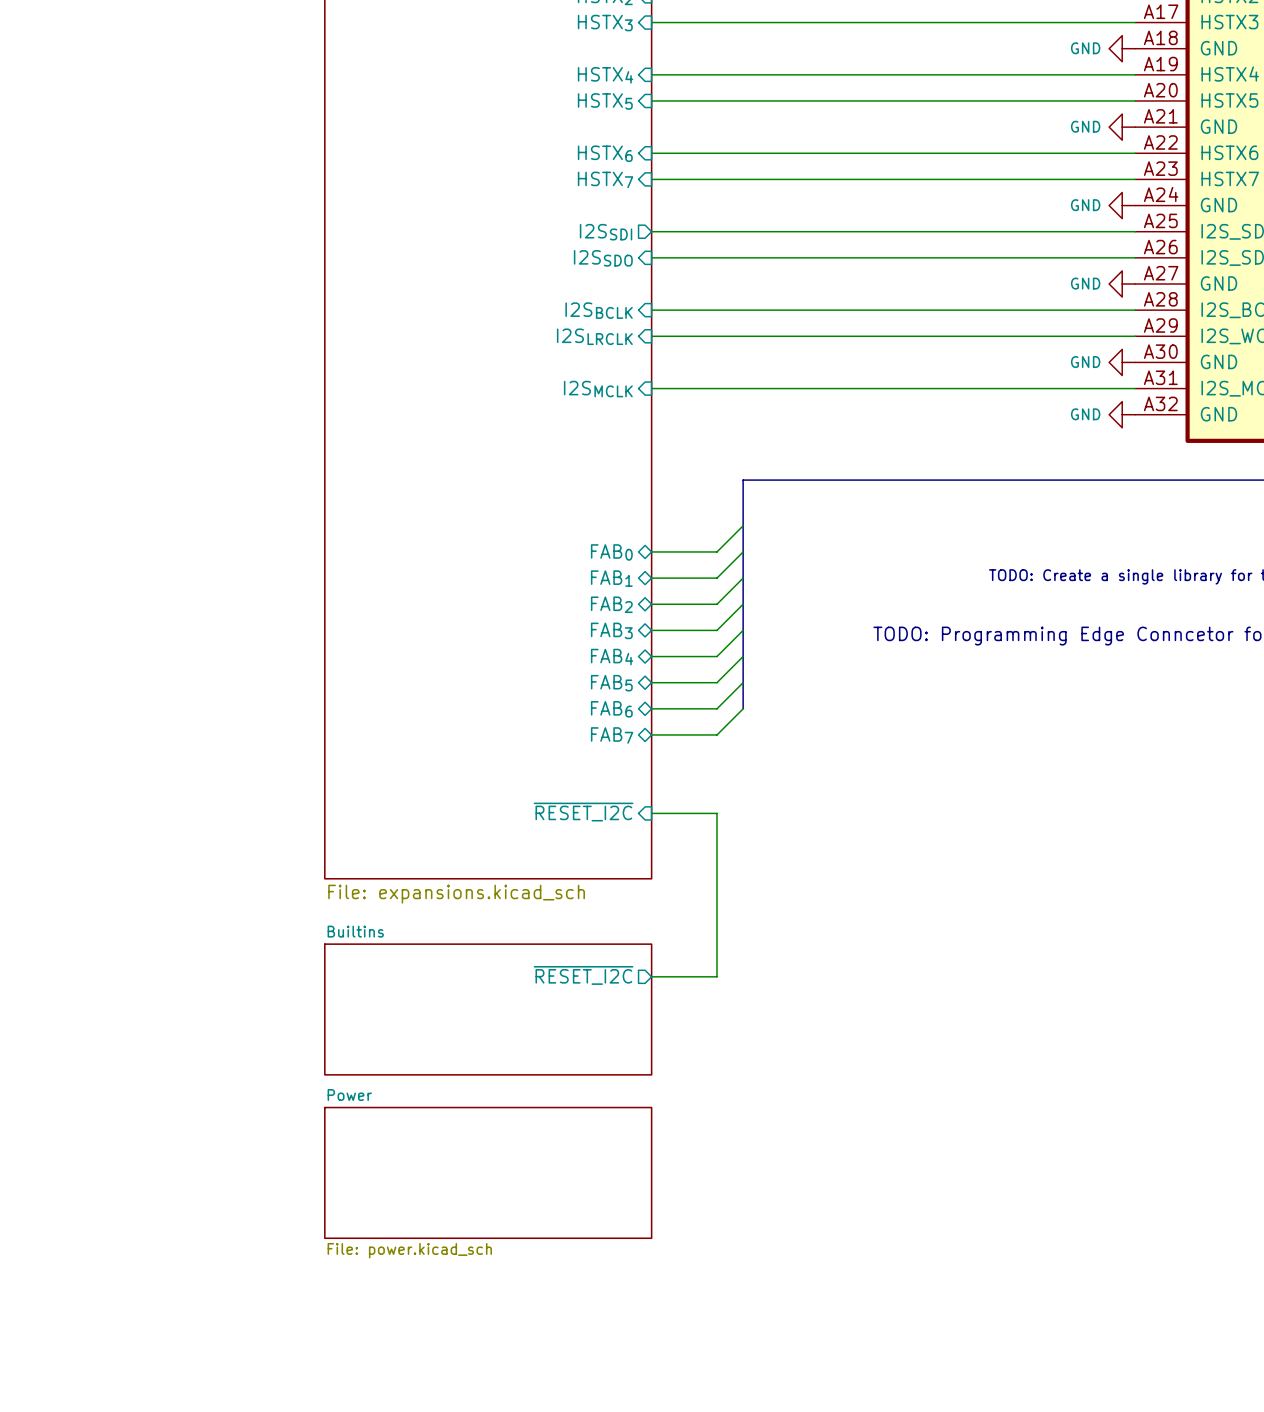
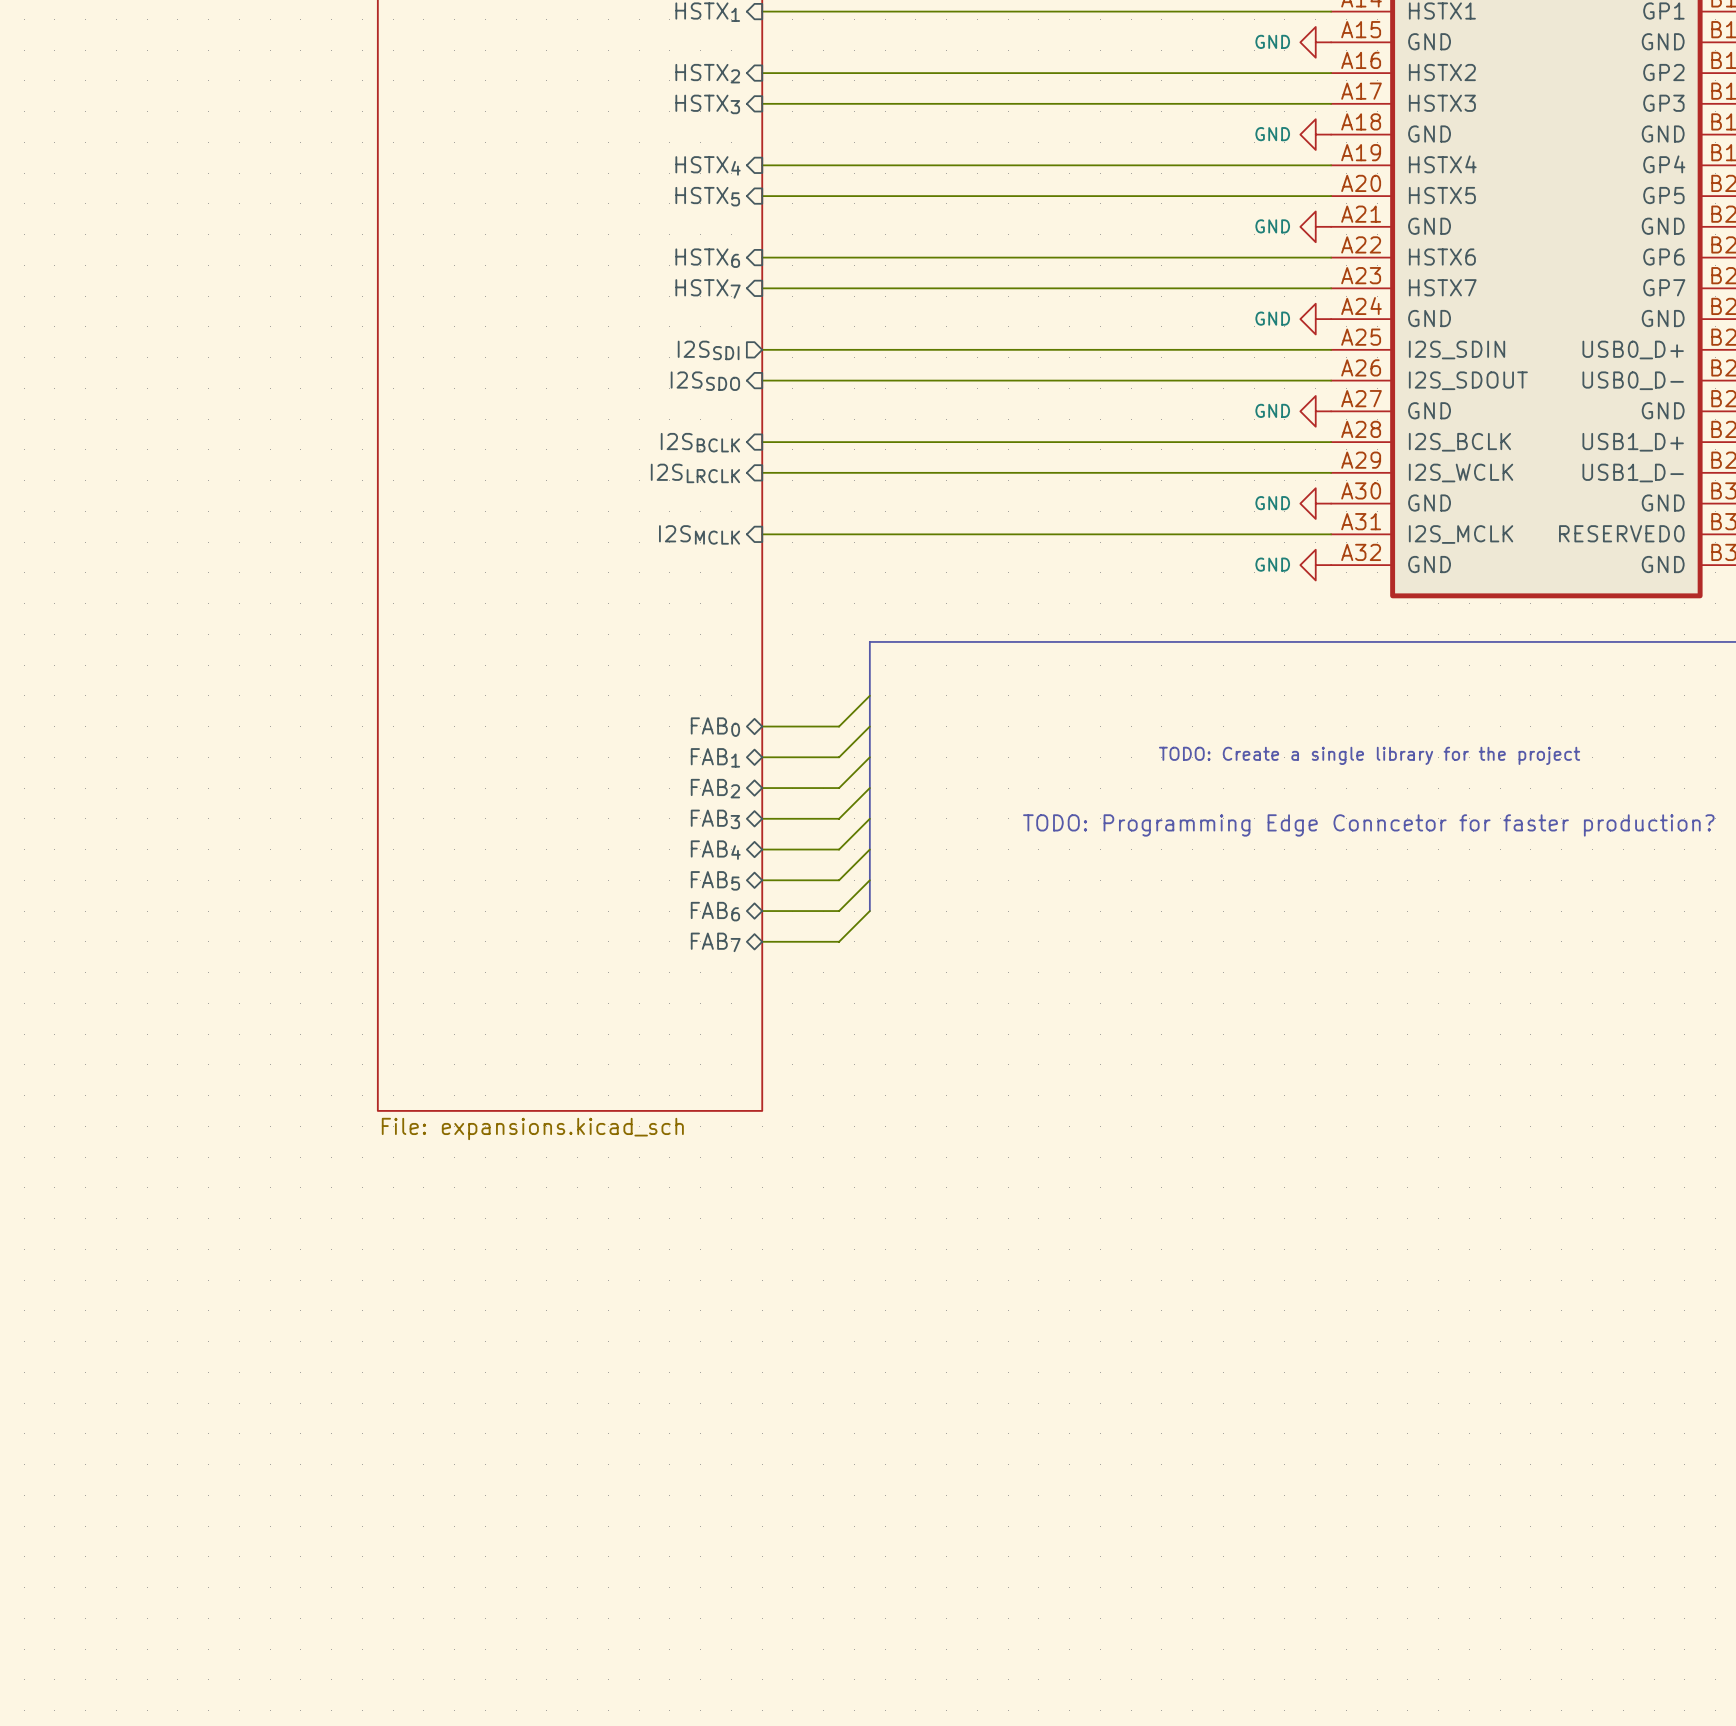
sheet pin: ~{RESET_I2C} (583, 812) -> none
wire: (651, 813) (716, 813) (716, 976) (651, 976) -> none
sheet pin: ~{RESET_I2C} (583, 975) -> none
sheet Builtins: (488, 1009) -> none
sheet Power: File: power.kicad_sch (488, 1172) -> none

